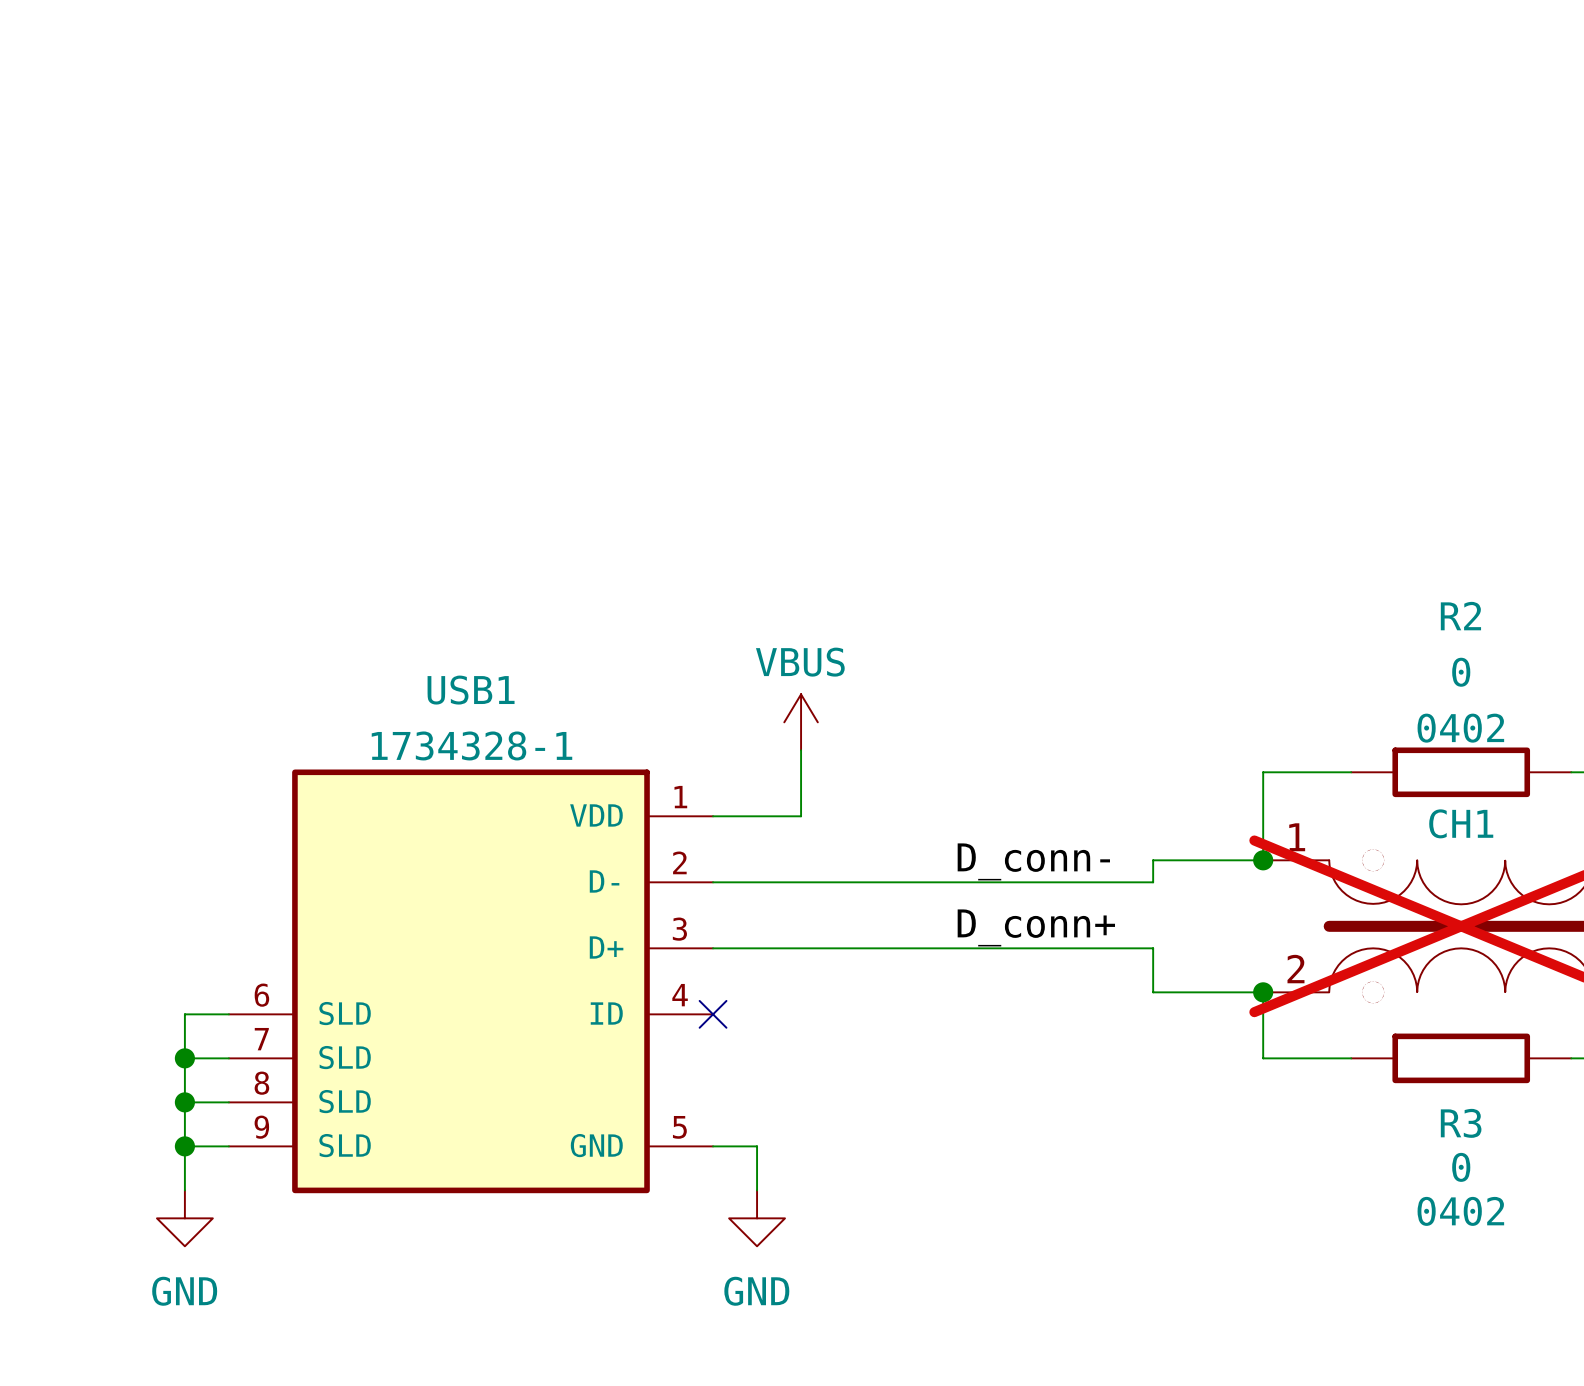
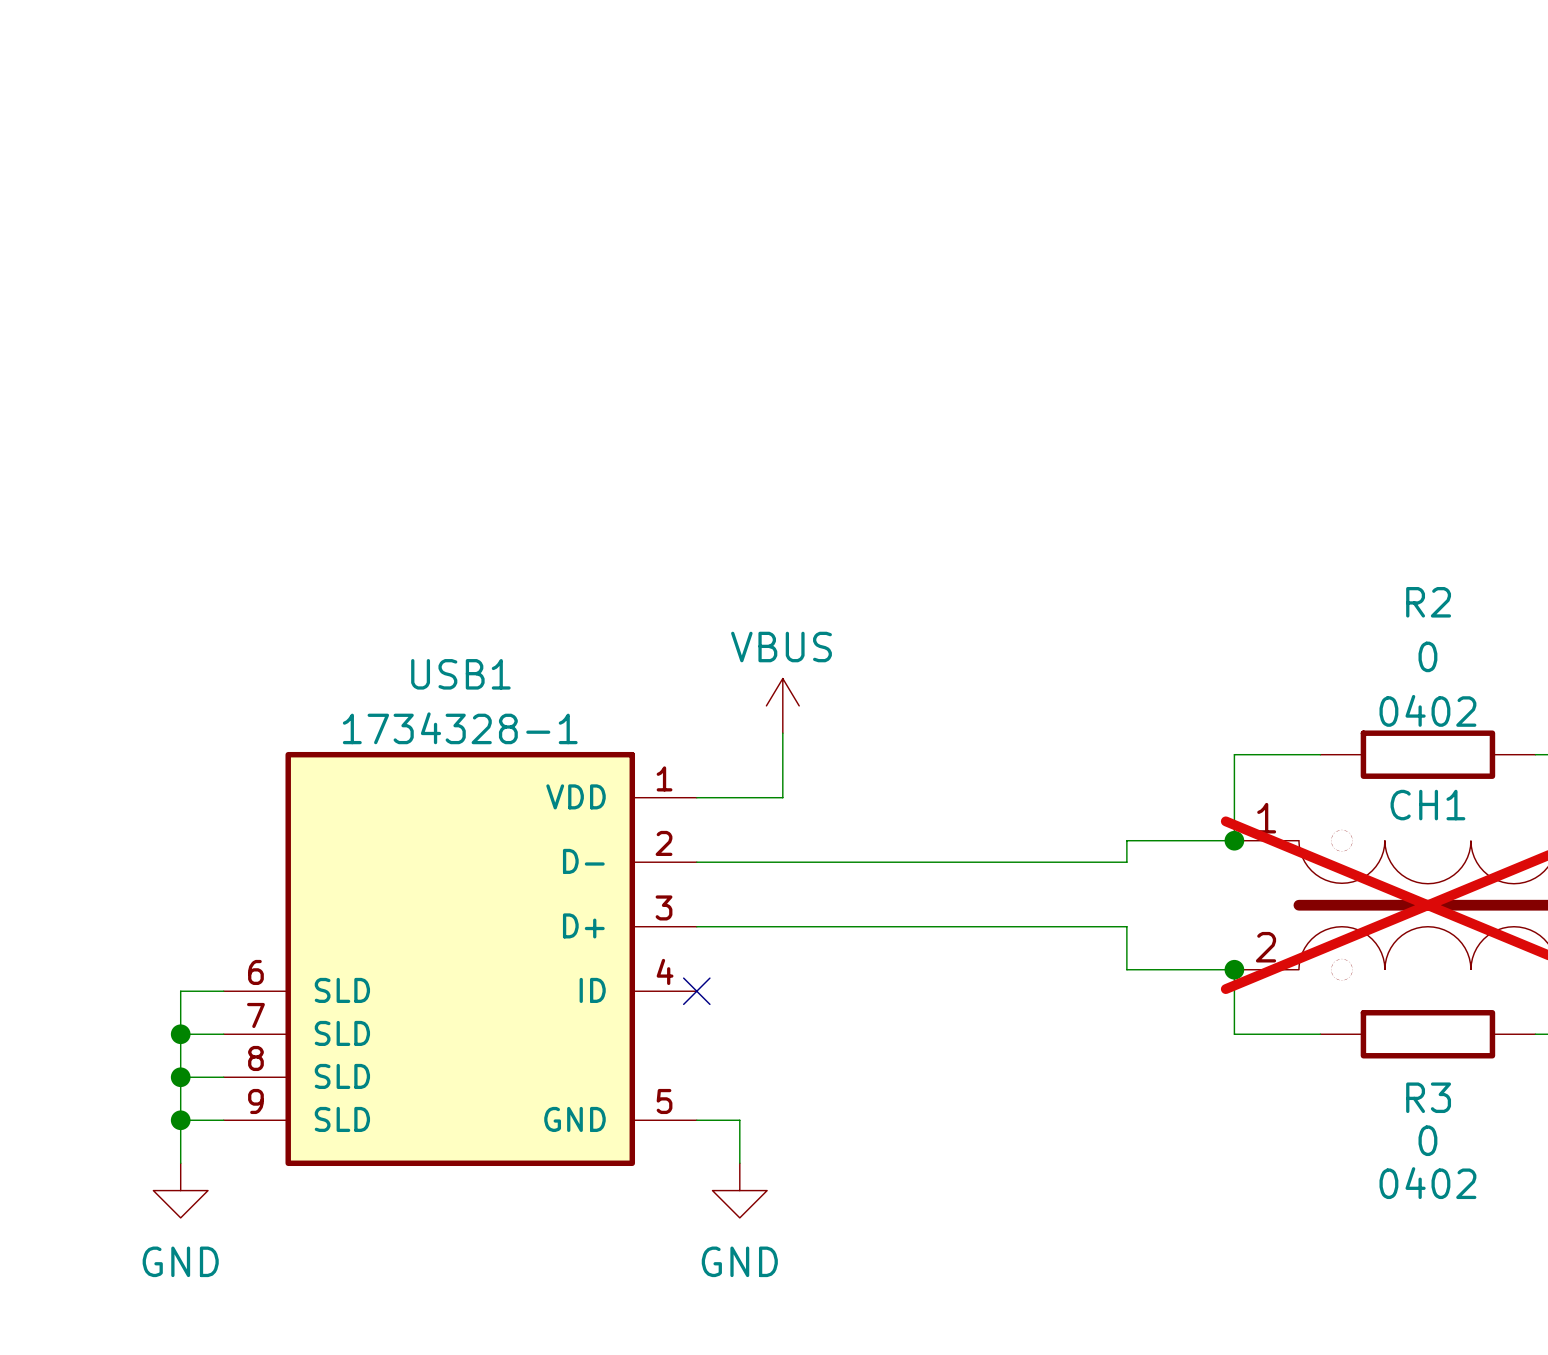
label: D_conn- (1033, 861) -> none
label: D_conn+ (1036, 927) -> none

